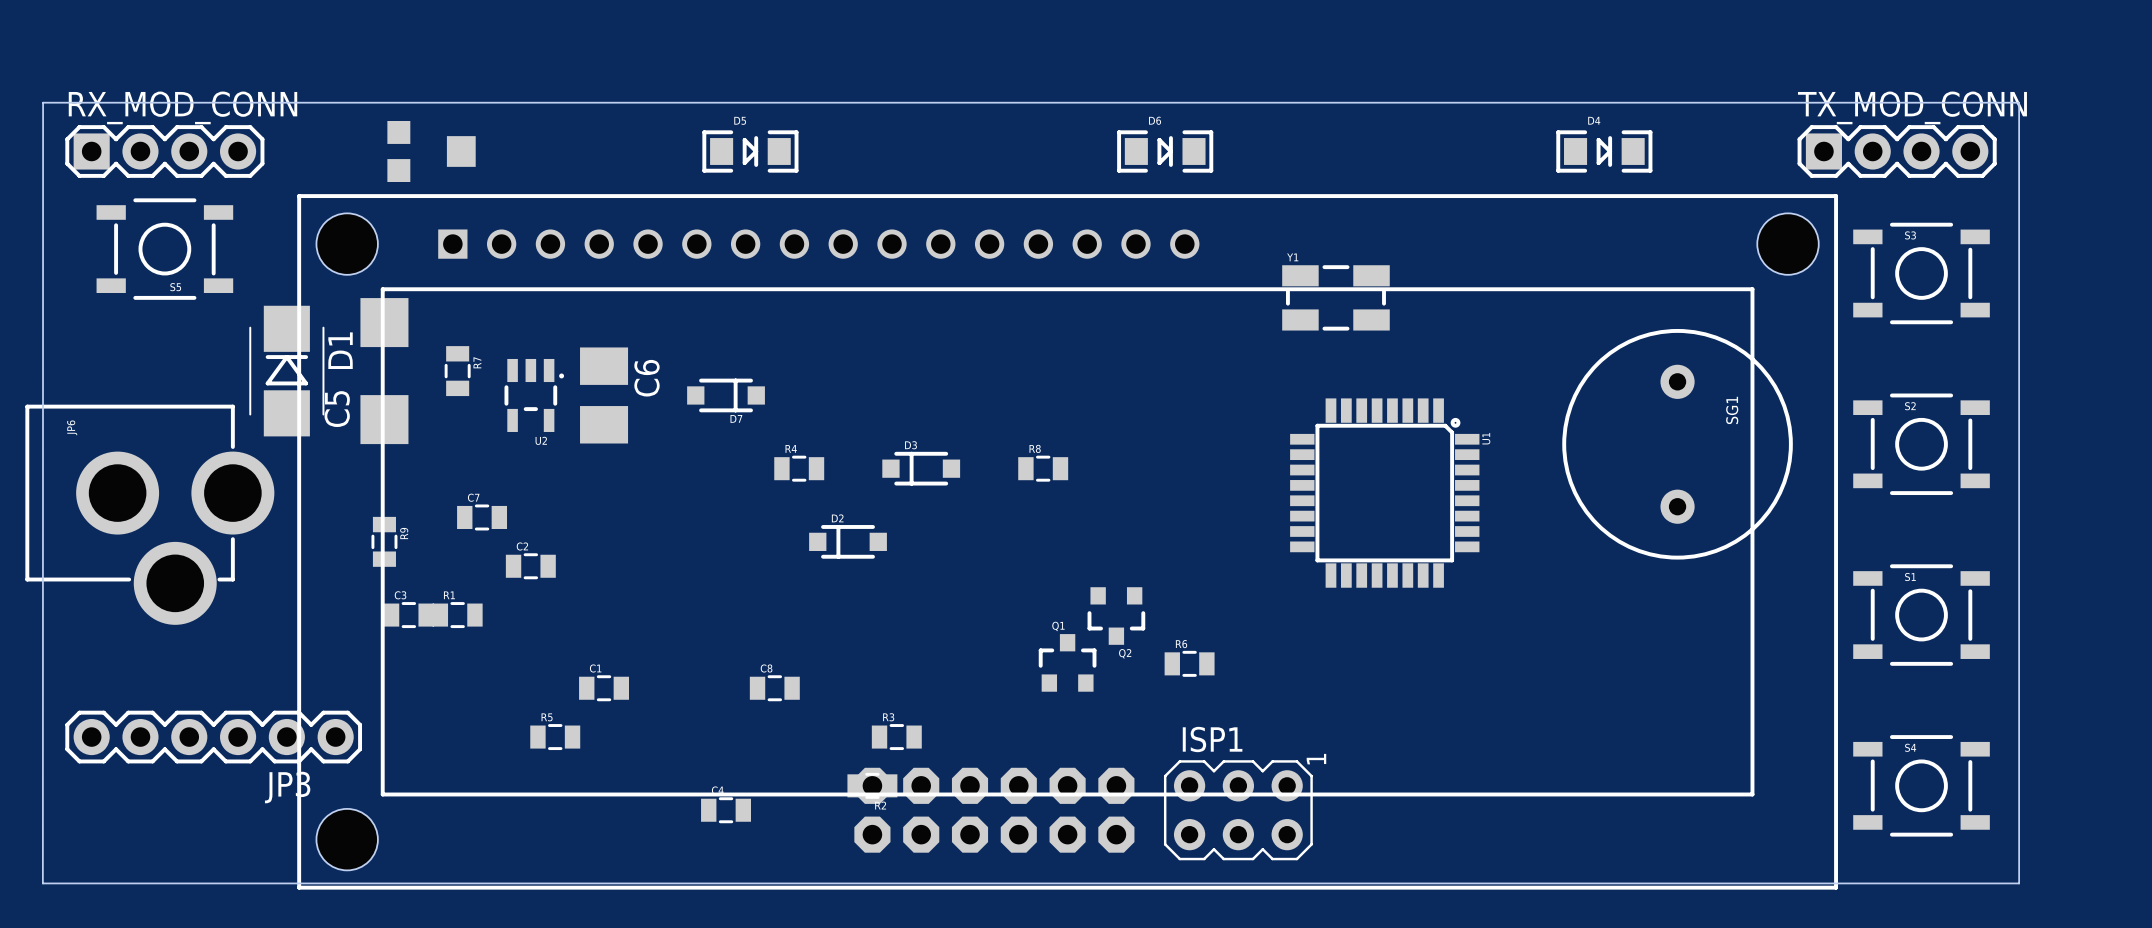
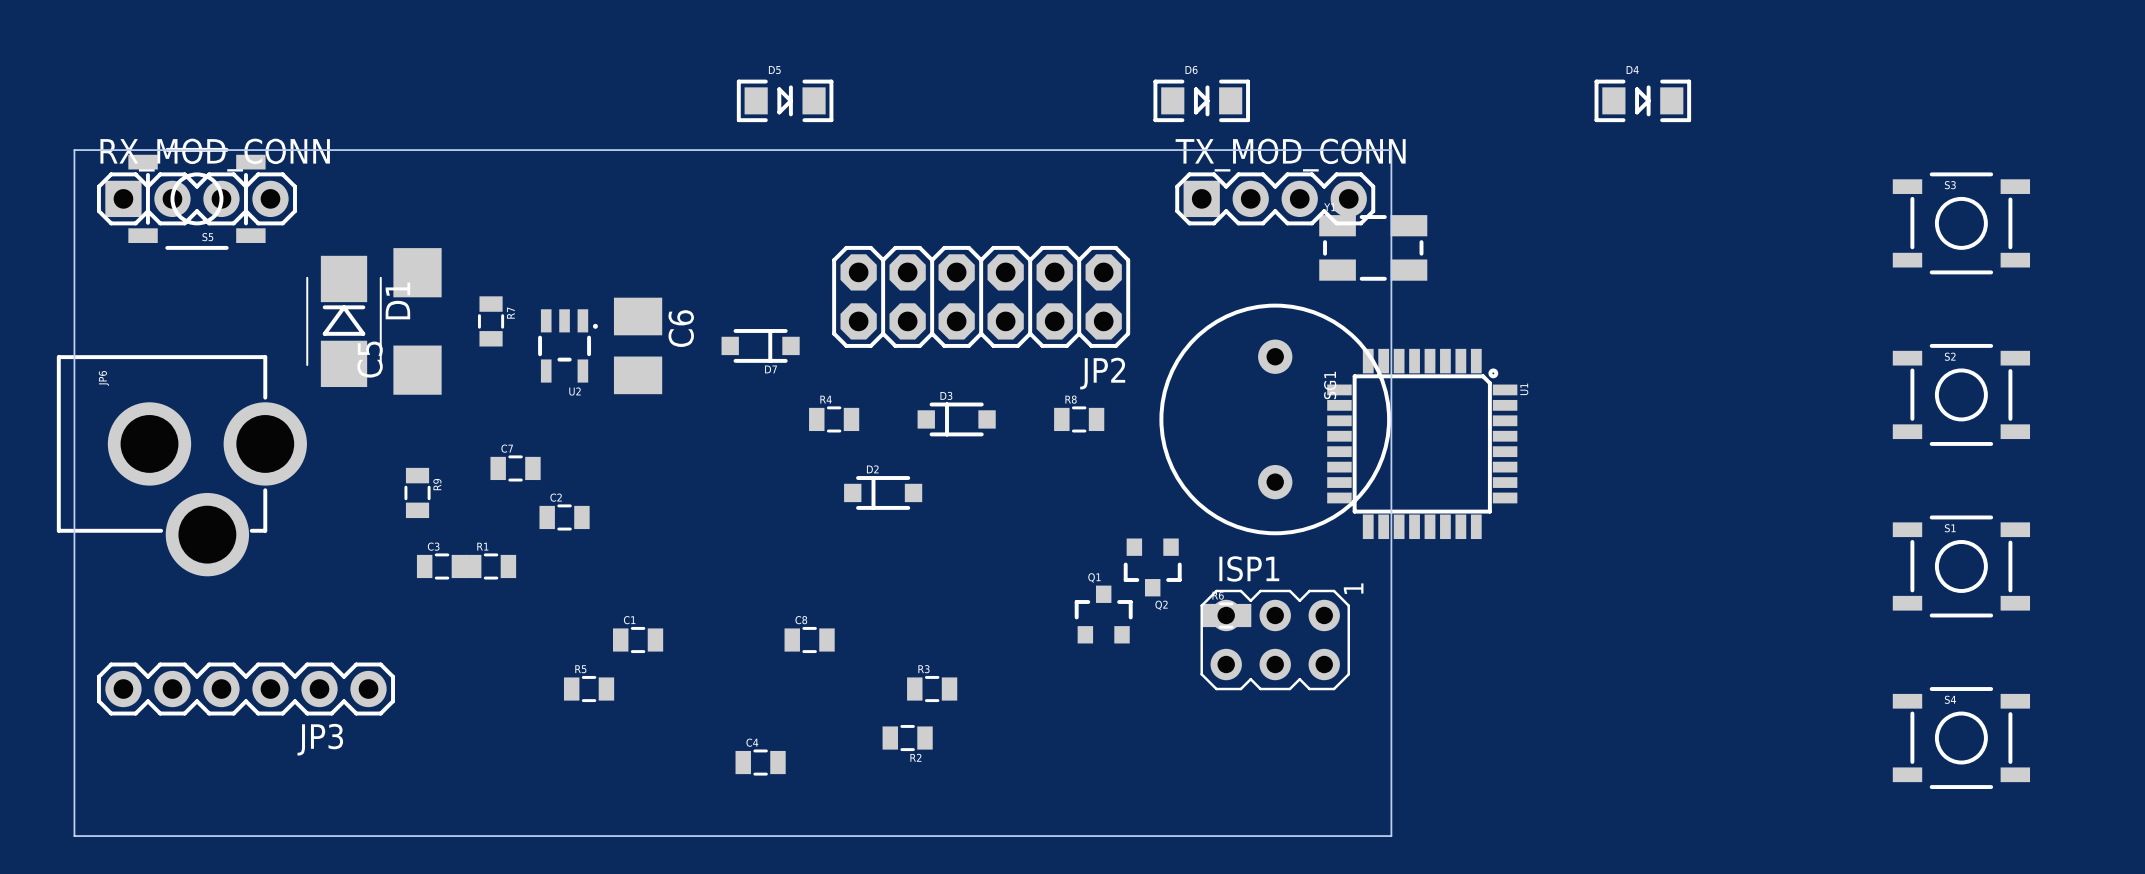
RX_MOD_CONN position: (164, 151) -> (196, 198)
part: (431, 151) -> none
TX_MOD_CONN: (1897, 151) -> none
TX_MOD_CONN: none -> (1275, 198)
D1 position: (286, 371) -> (344, 321)
SG1 position: (1677, 444) -> (1275, 419)
part: (1067, 541) -> none
JP2 side: bottom (994, 810) -> top (981, 296)
ISP1 position: (1238, 810) -> (1275, 640)
board edge: (42, 883) (43, 102) (2019, 102) (2019, 883) (1354, 883) -> (74, 836) (74, 150) (1391, 150) (1391, 836)

